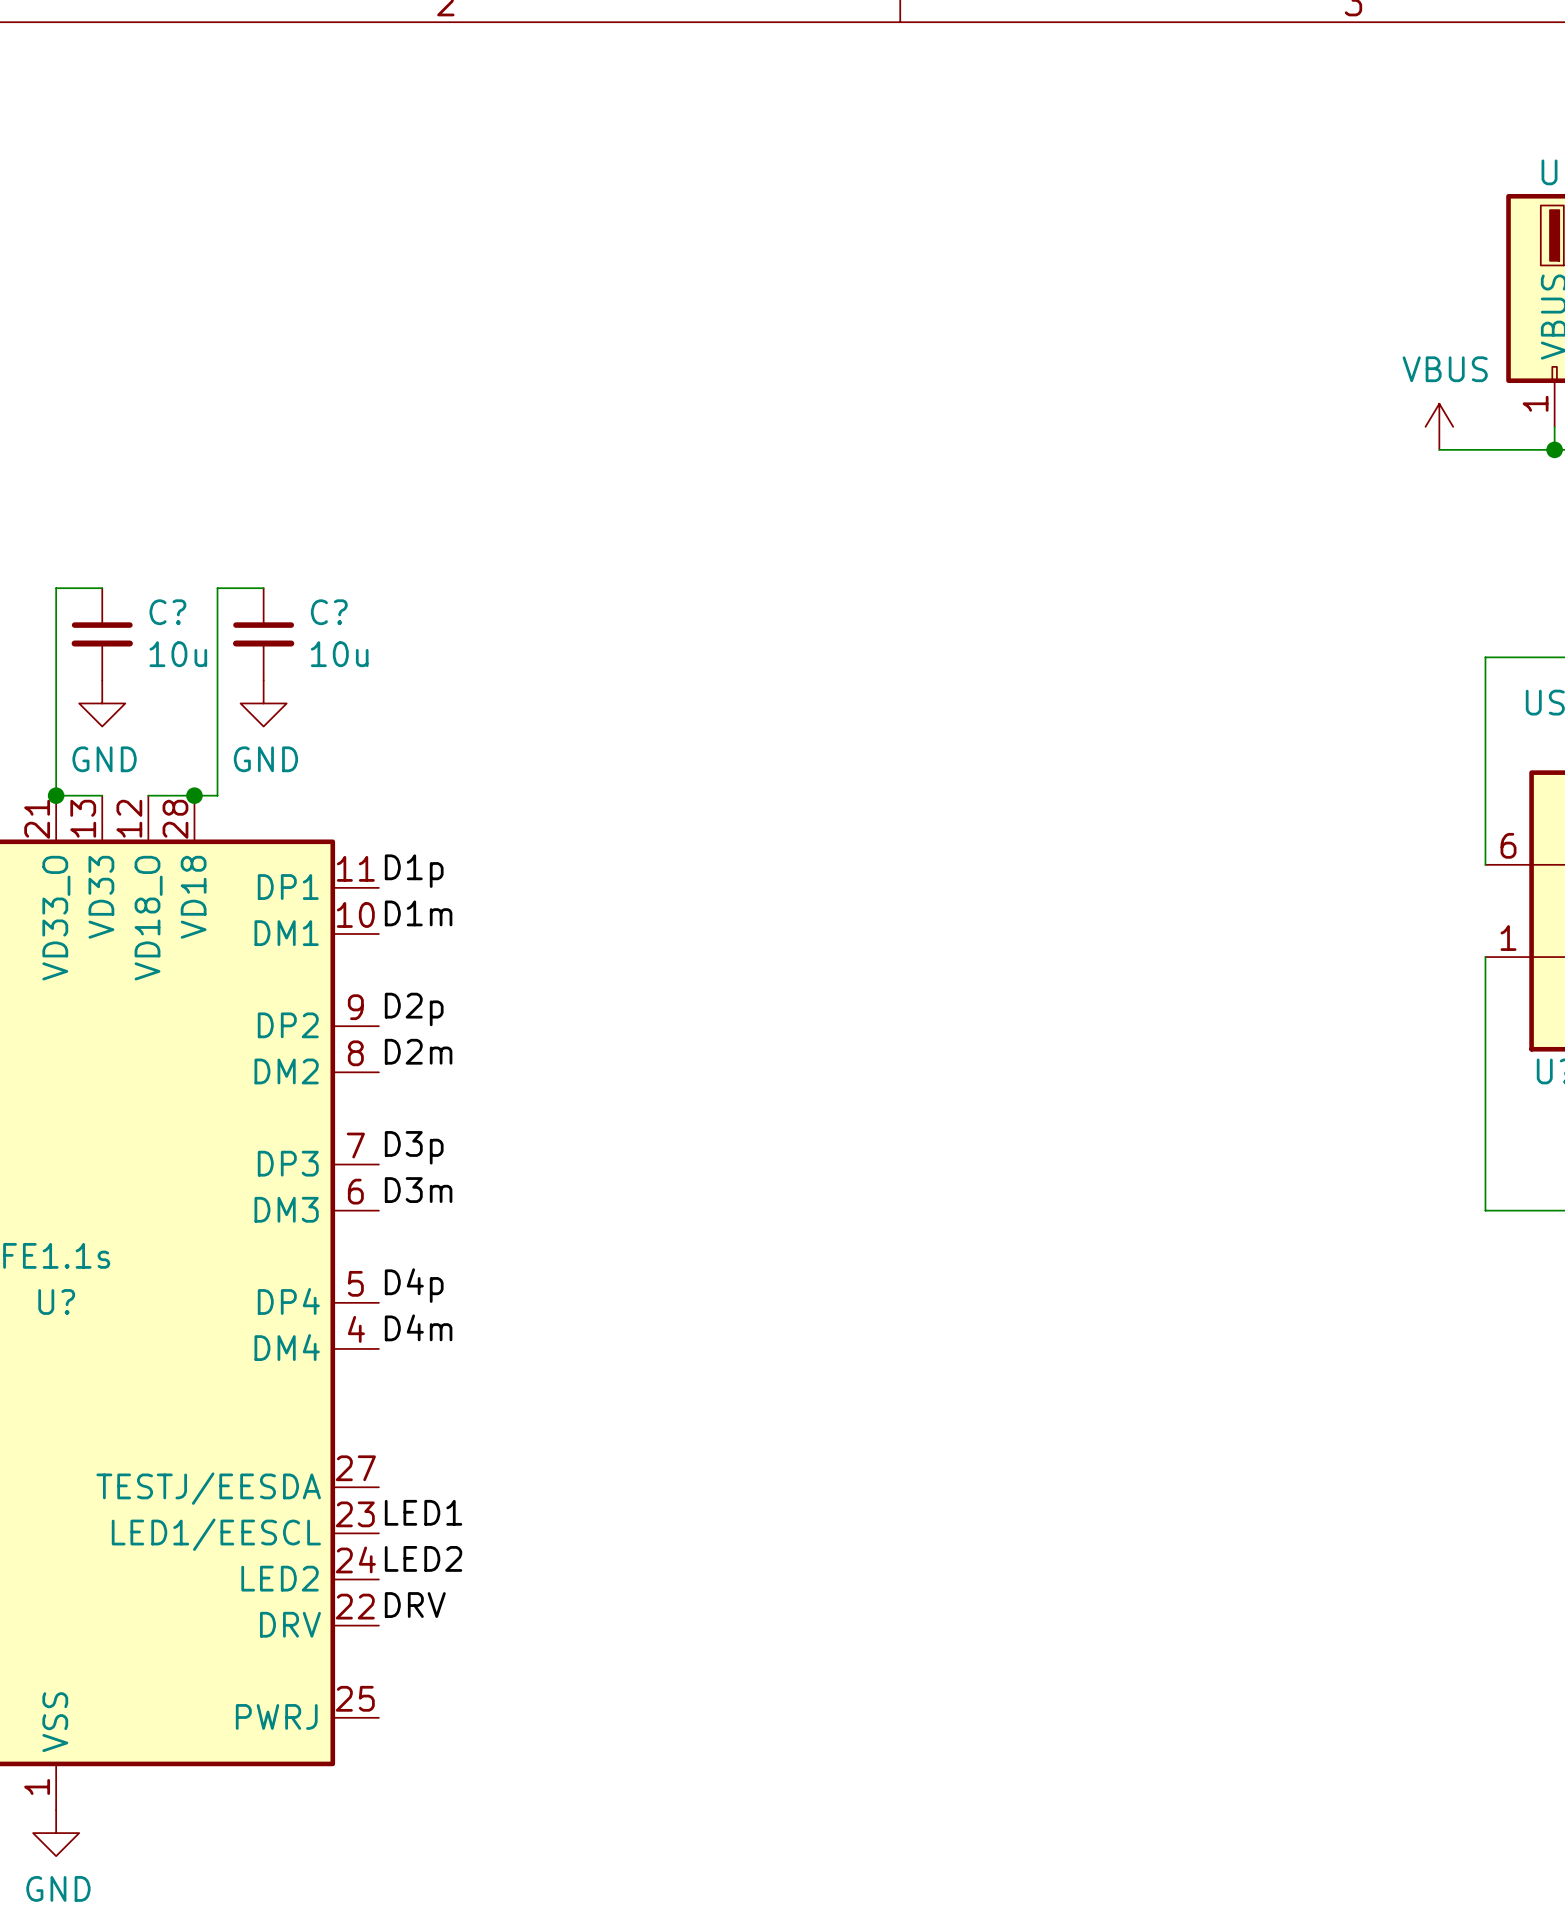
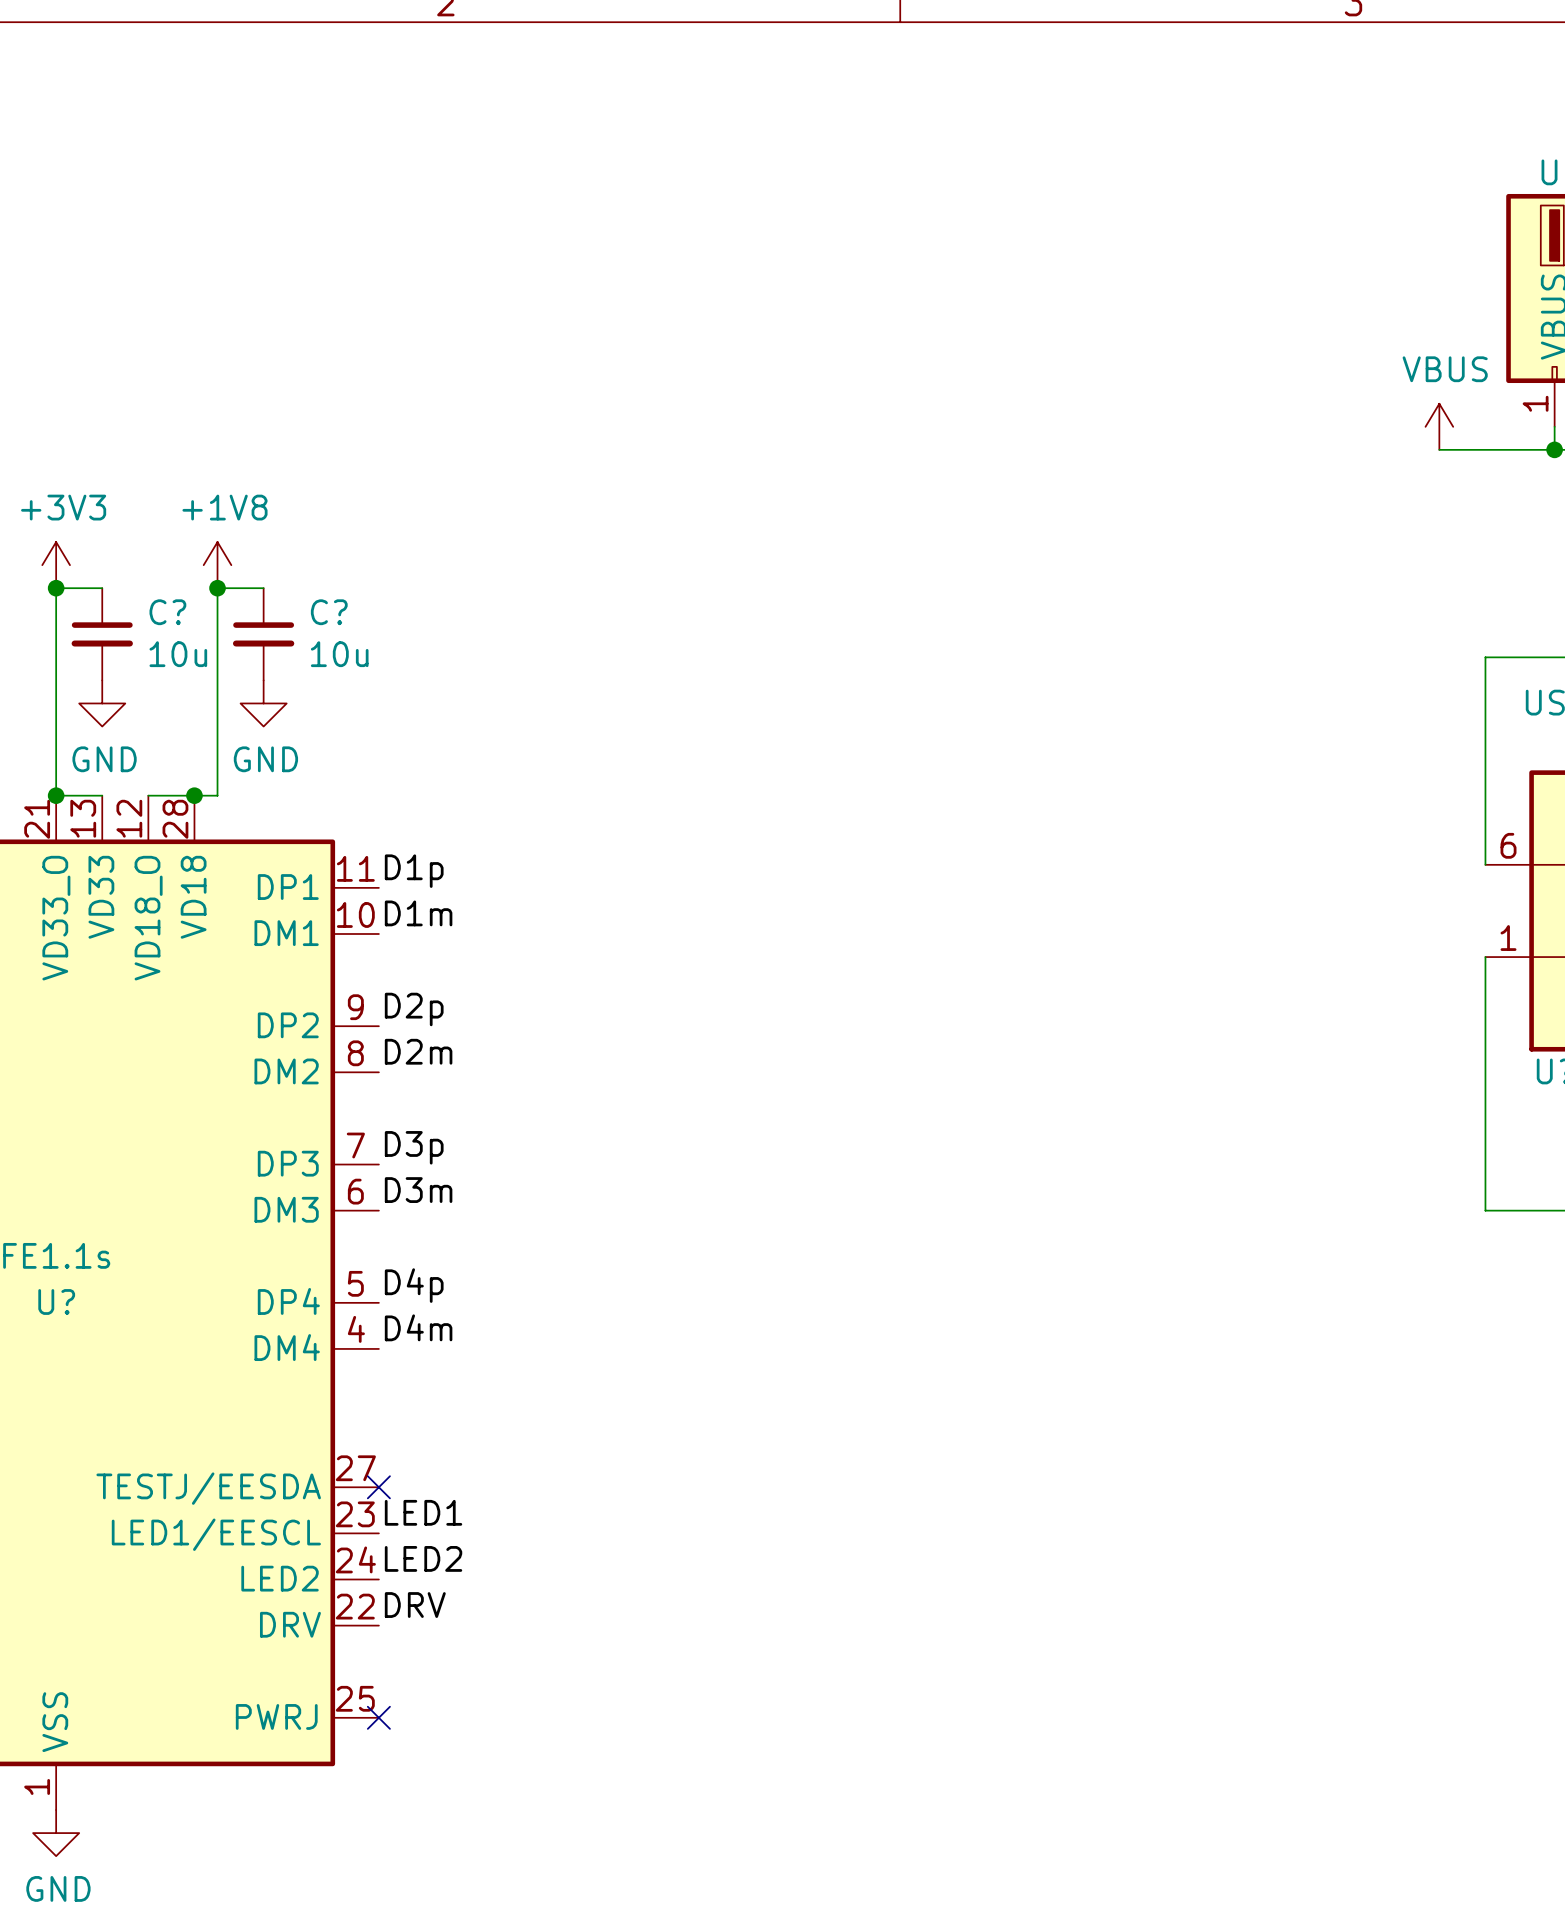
power symbol: none -> +3V3 (56, 565)
power symbol: none -> +1V8 (217, 565)
junction: none -> (56, 588)
junction: none -> (217, 588)
no-connect mark: none -> (378, 1487)
no-connect mark: none -> (378, 1717)

